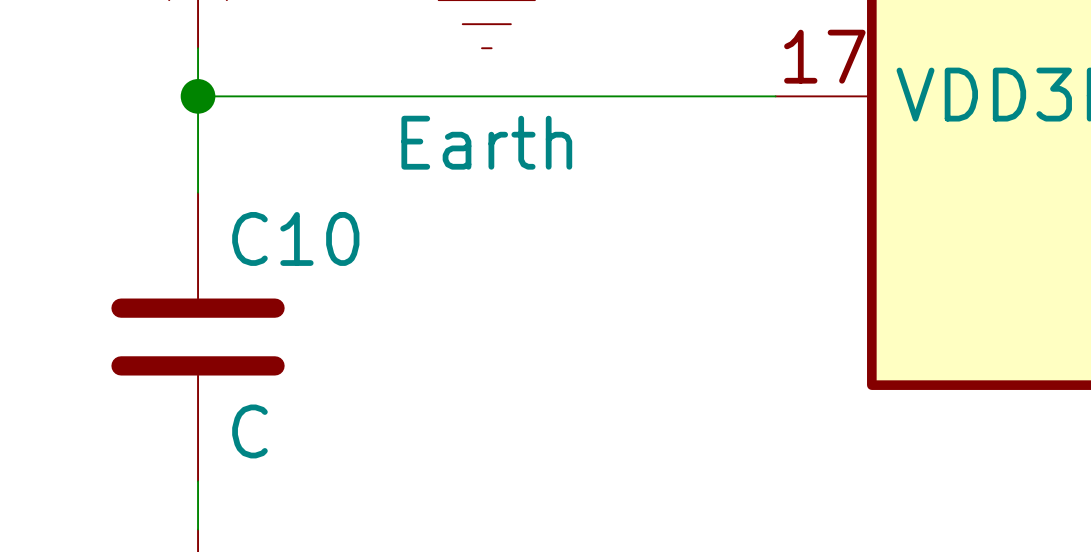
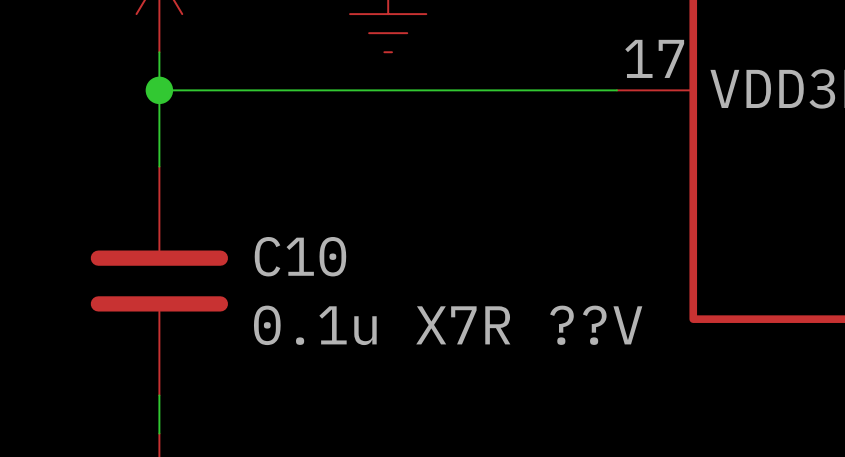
power symbol text: Earth (486, 142) -> none
C10 name position: C10 (295, 238) -> C10 (300, 256)
C10 value: C (249, 431) -> 0.1u X7R ??V (448, 325)

